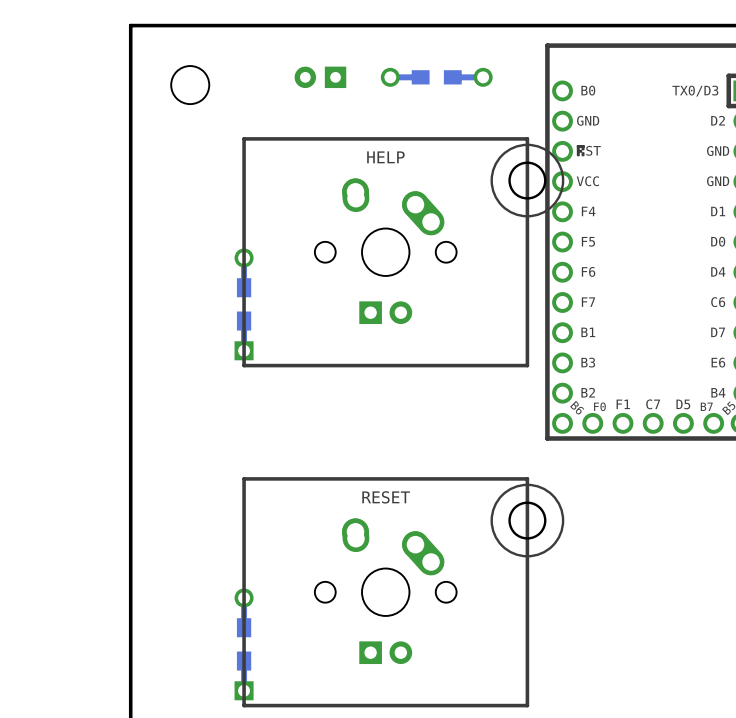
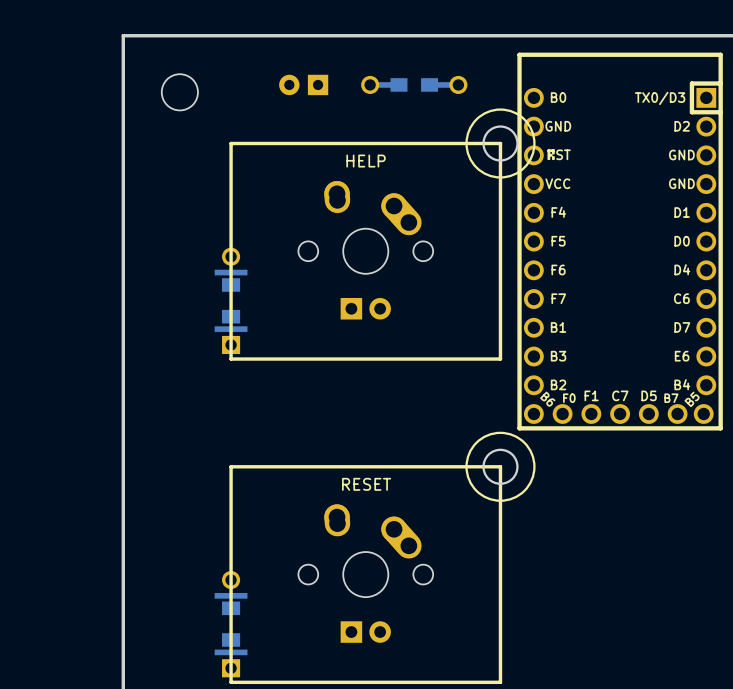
drawing position: (527, 180) -> (500, 143)
round board edge position: (527, 180) -> (500, 143)
part footprint: [234, 248, 254, 361] -> [214, 247, 248, 355]
drawing position: (527, 520) -> (500, 466)
round board edge position: (527, 520) -> (500, 466)
part footprint: [234, 588, 254, 701] -> [214, 570, 248, 678]

